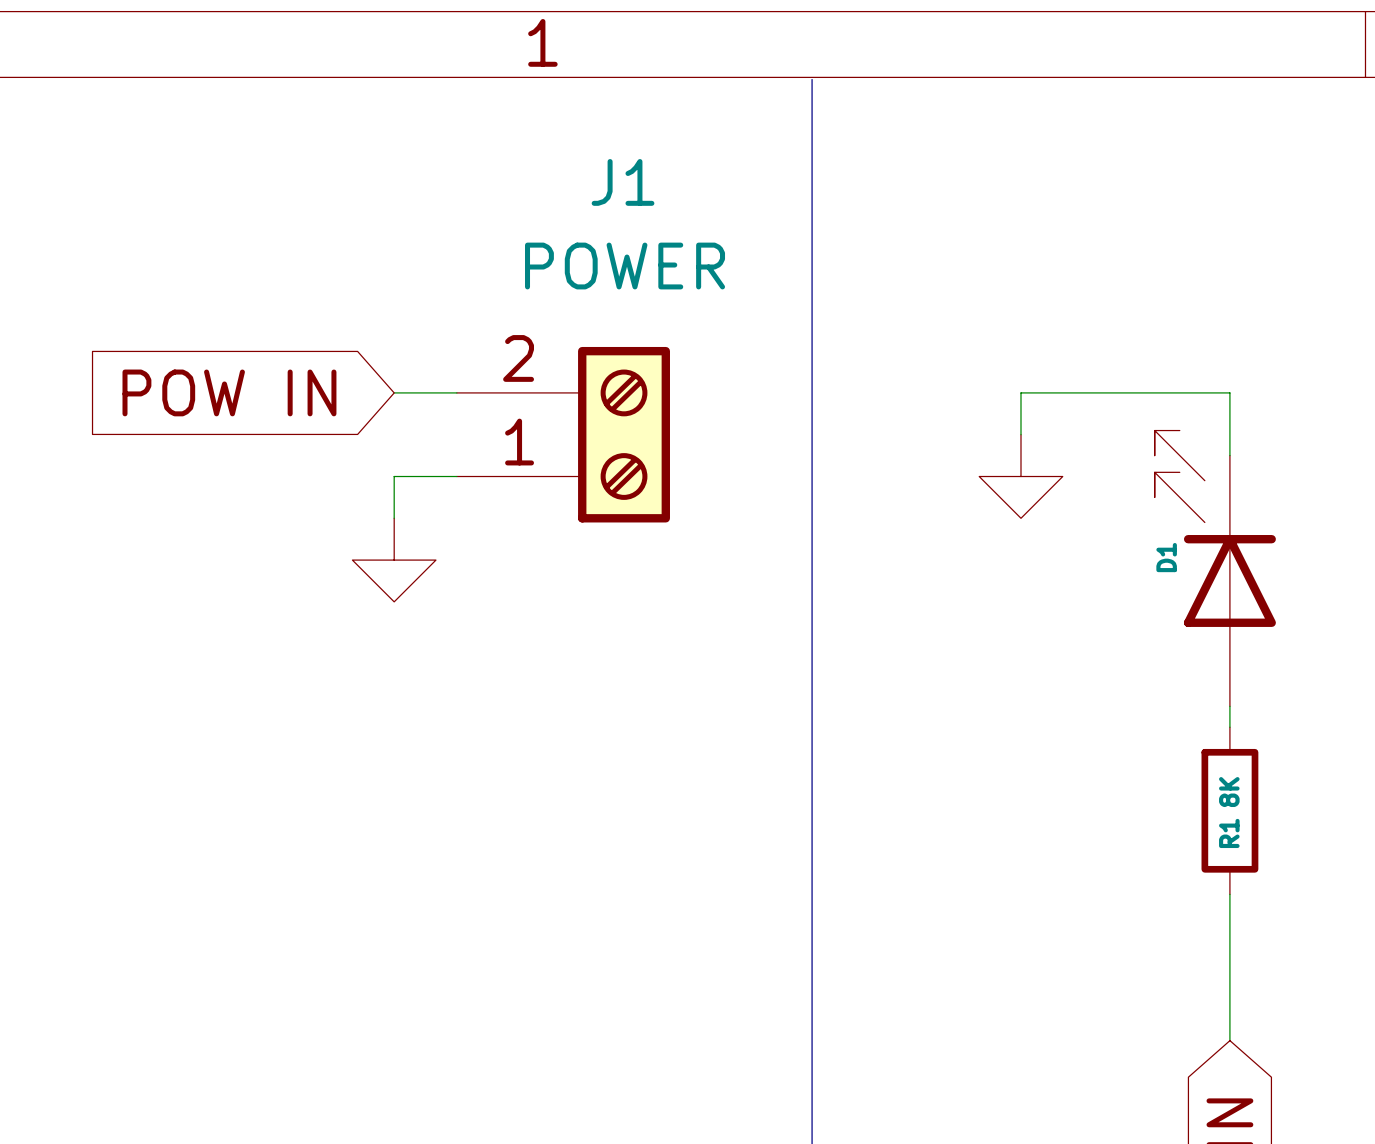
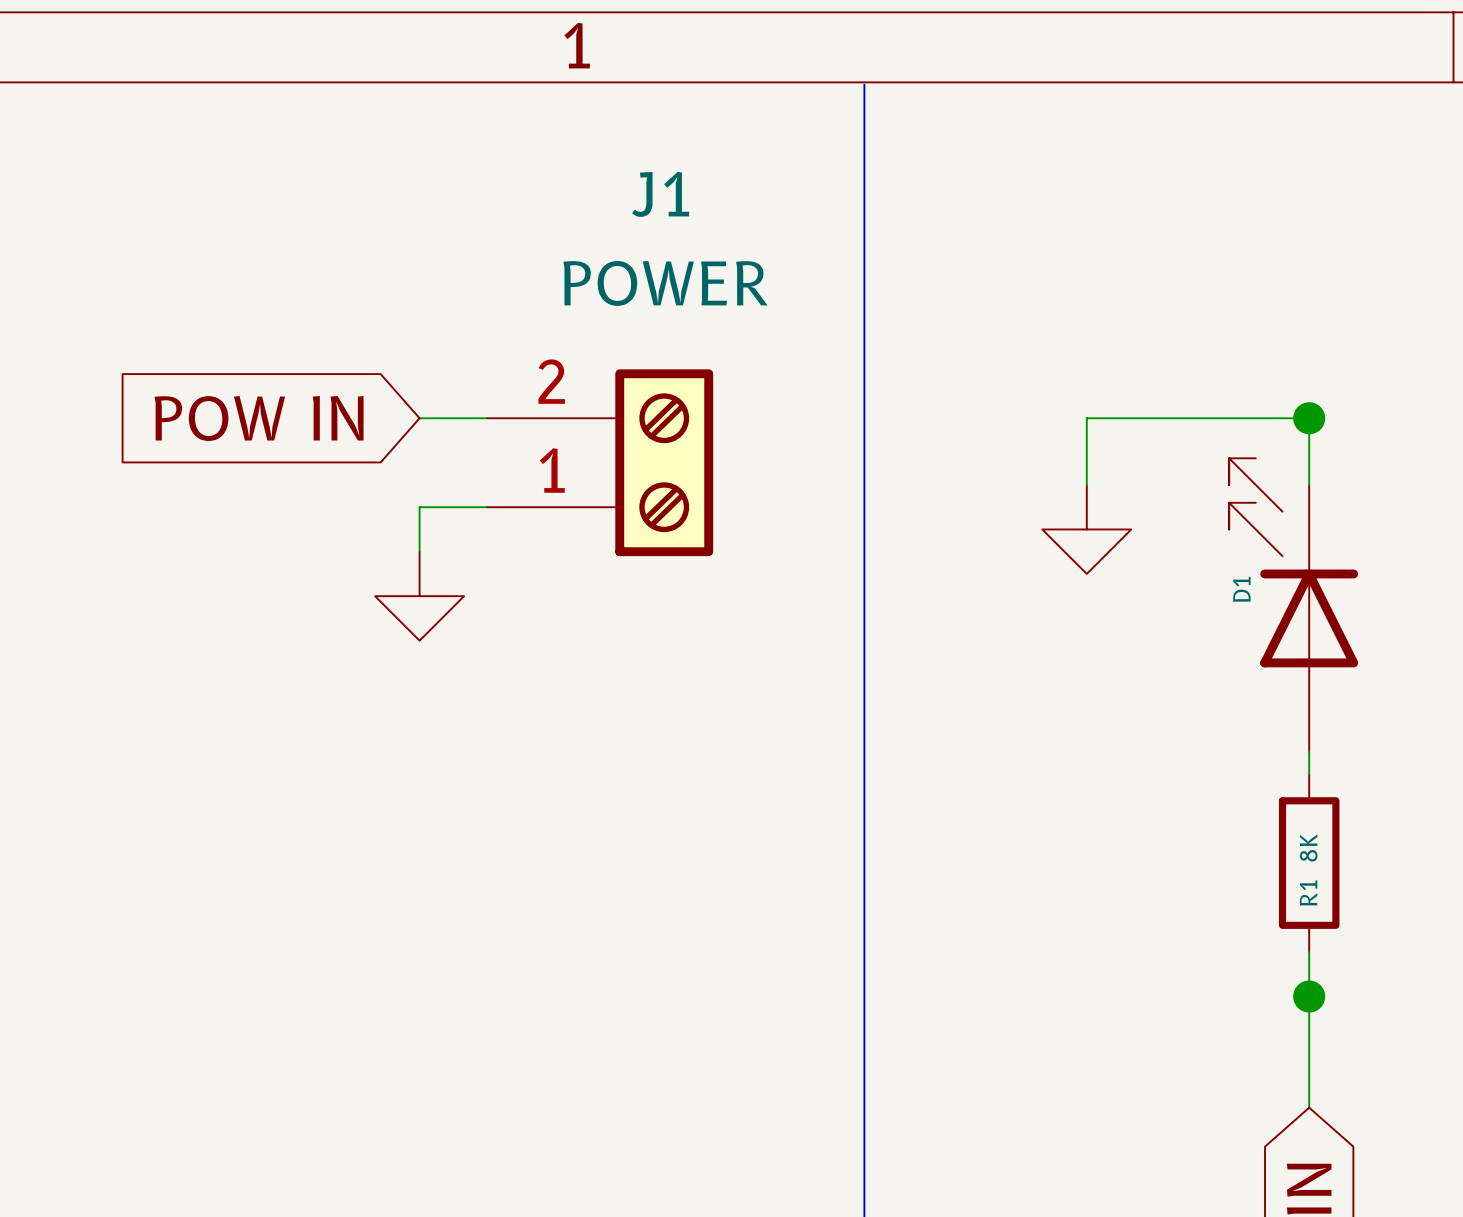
junction: none -> (1309, 418)
power symbol position: (1020, 476) -> (1086, 529)
junction: none -> (1309, 996)

